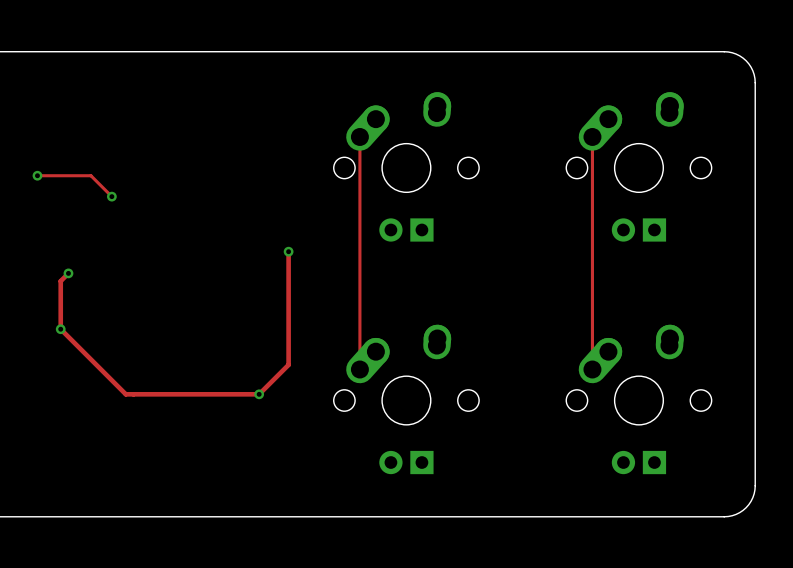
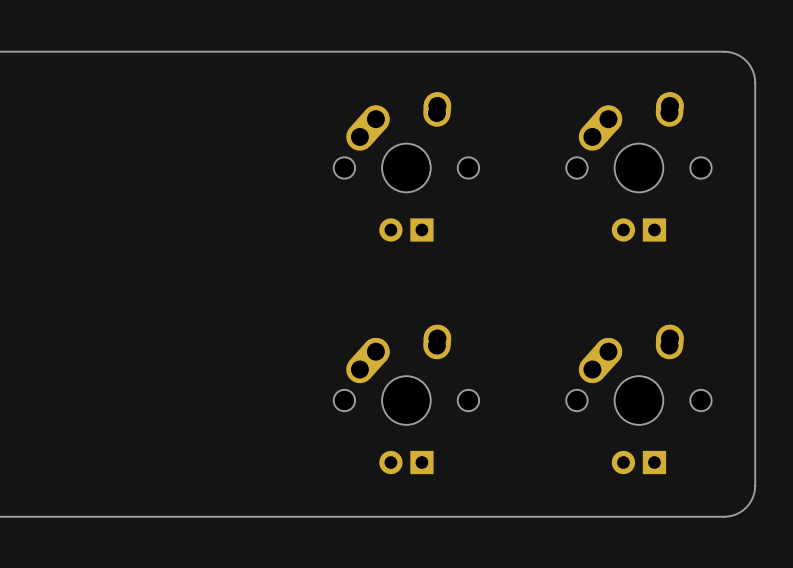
track: (359, 136) (359, 369) -> none
track: (592, 136) (592, 369) -> none
track: (37, 175) (90, 175) (111, 196) -> none
via: (37, 175) -> none
via: (111, 196) -> none
track: (288, 251) (288, 364) (259, 394) (125, 394) (60, 329) (60, 281) (68, 273) -> none
via: (288, 251) -> none
via: (68, 273) -> none
via: (60, 329) -> none
via: (259, 394) -> none

